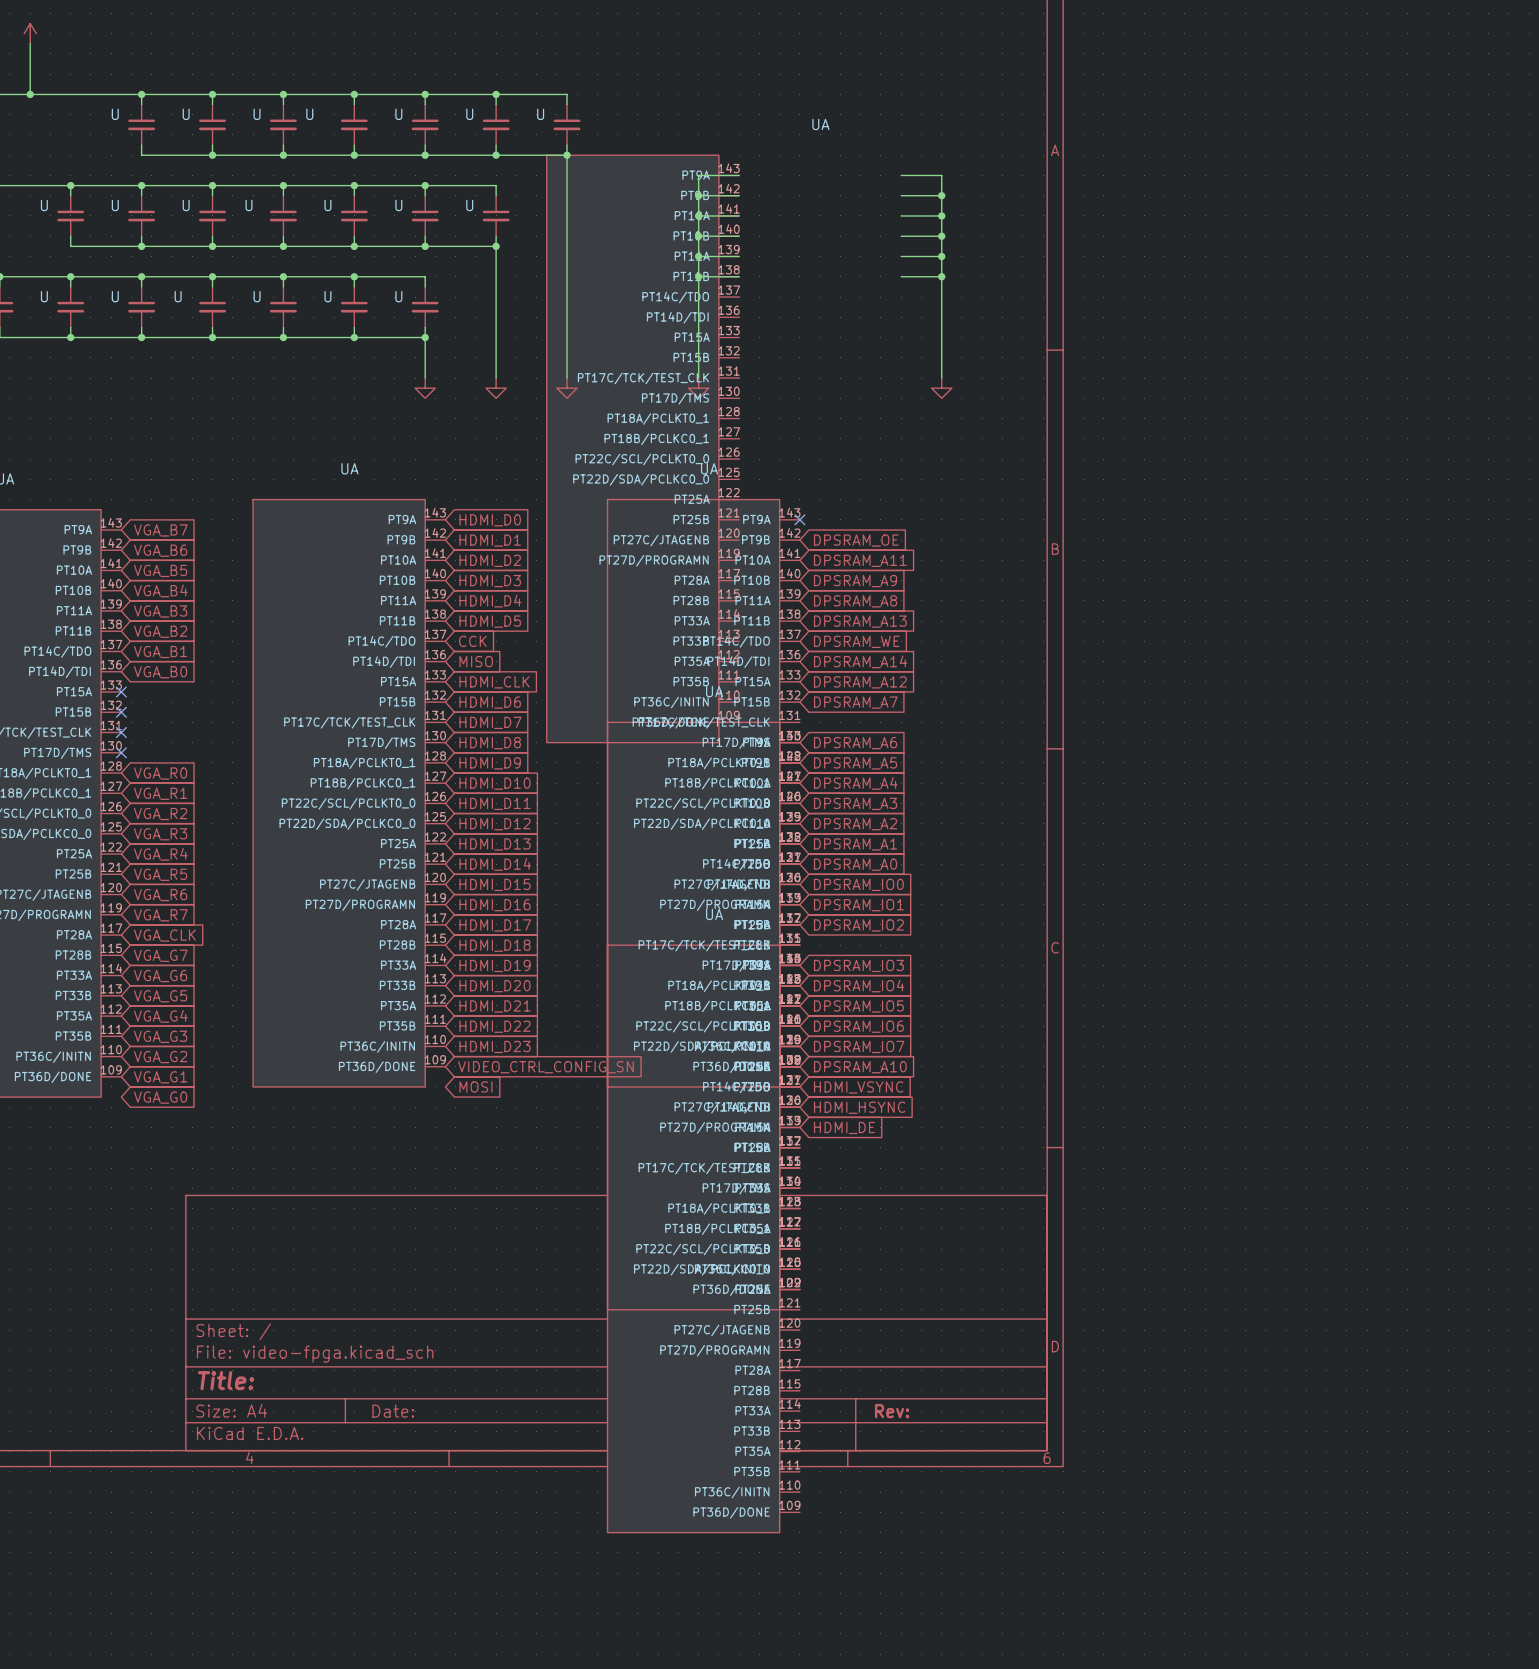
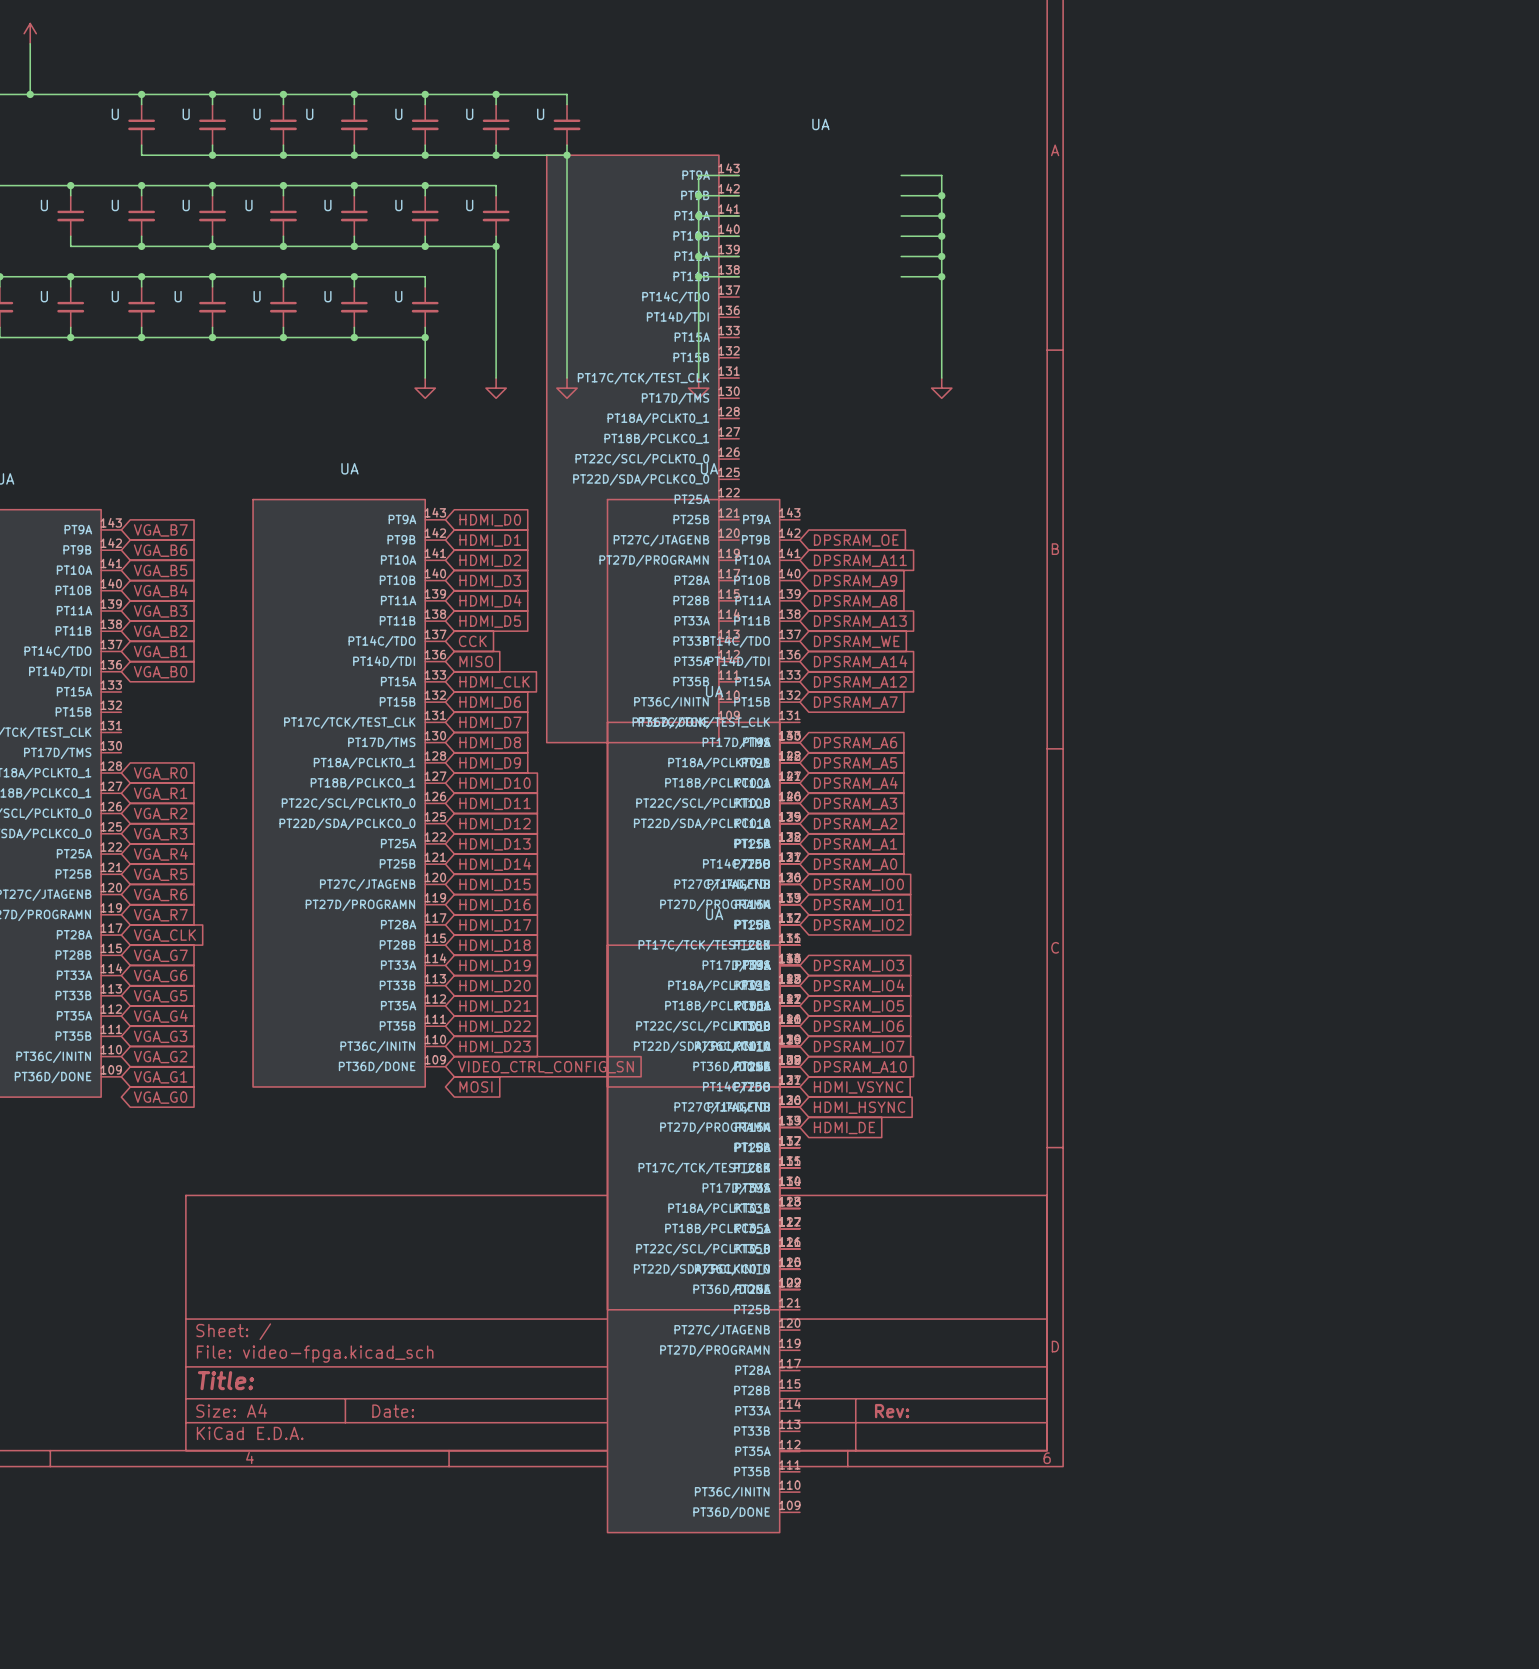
no-connect mark: (799, 519) -> none
no-connect mark: (121, 691) -> none
no-connect mark: (121, 712) -> none
no-connect mark: (121, 732) -> none
no-connect mark: (121, 752) -> none

